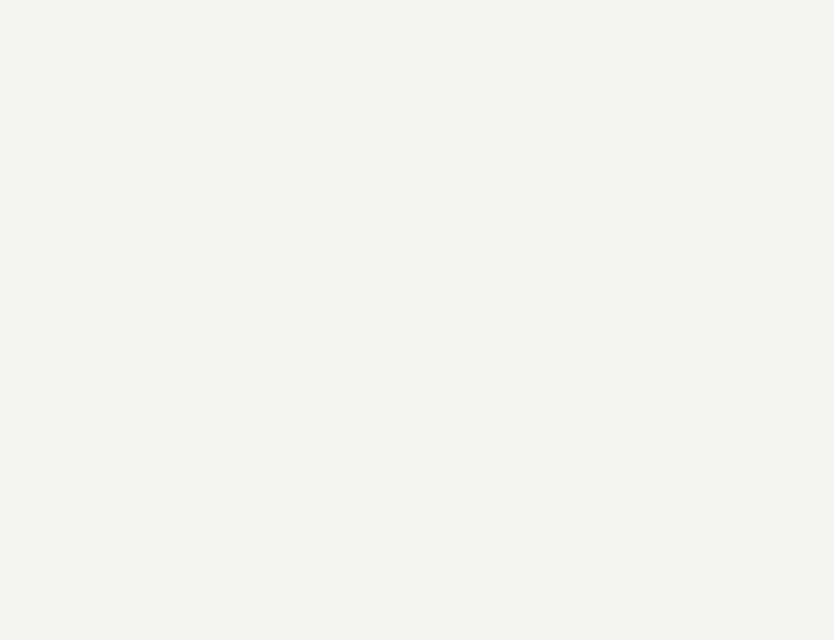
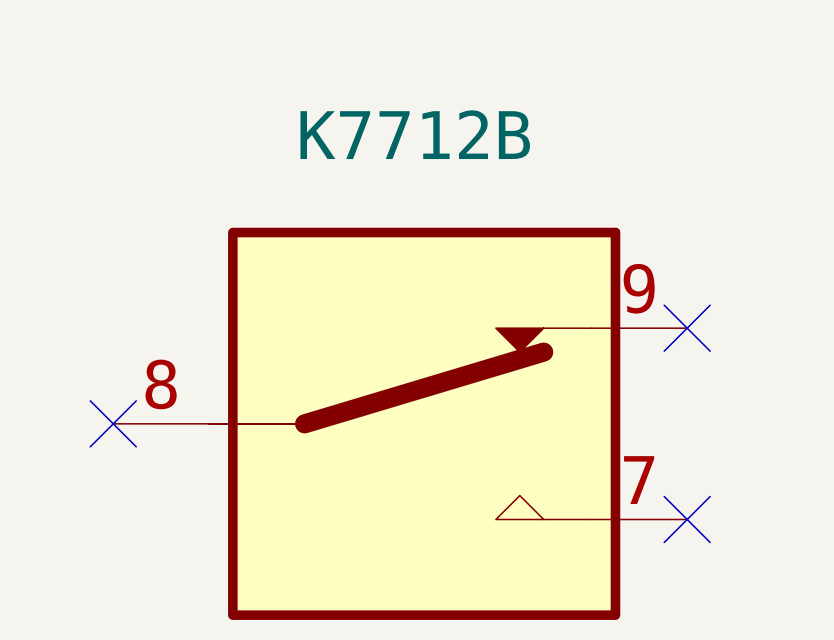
no-connect mark: none -> (687, 328)
no-connect mark: none -> (113, 423)
K7712B: none -> (400, 423)
no-connect mark: none -> (687, 519)

